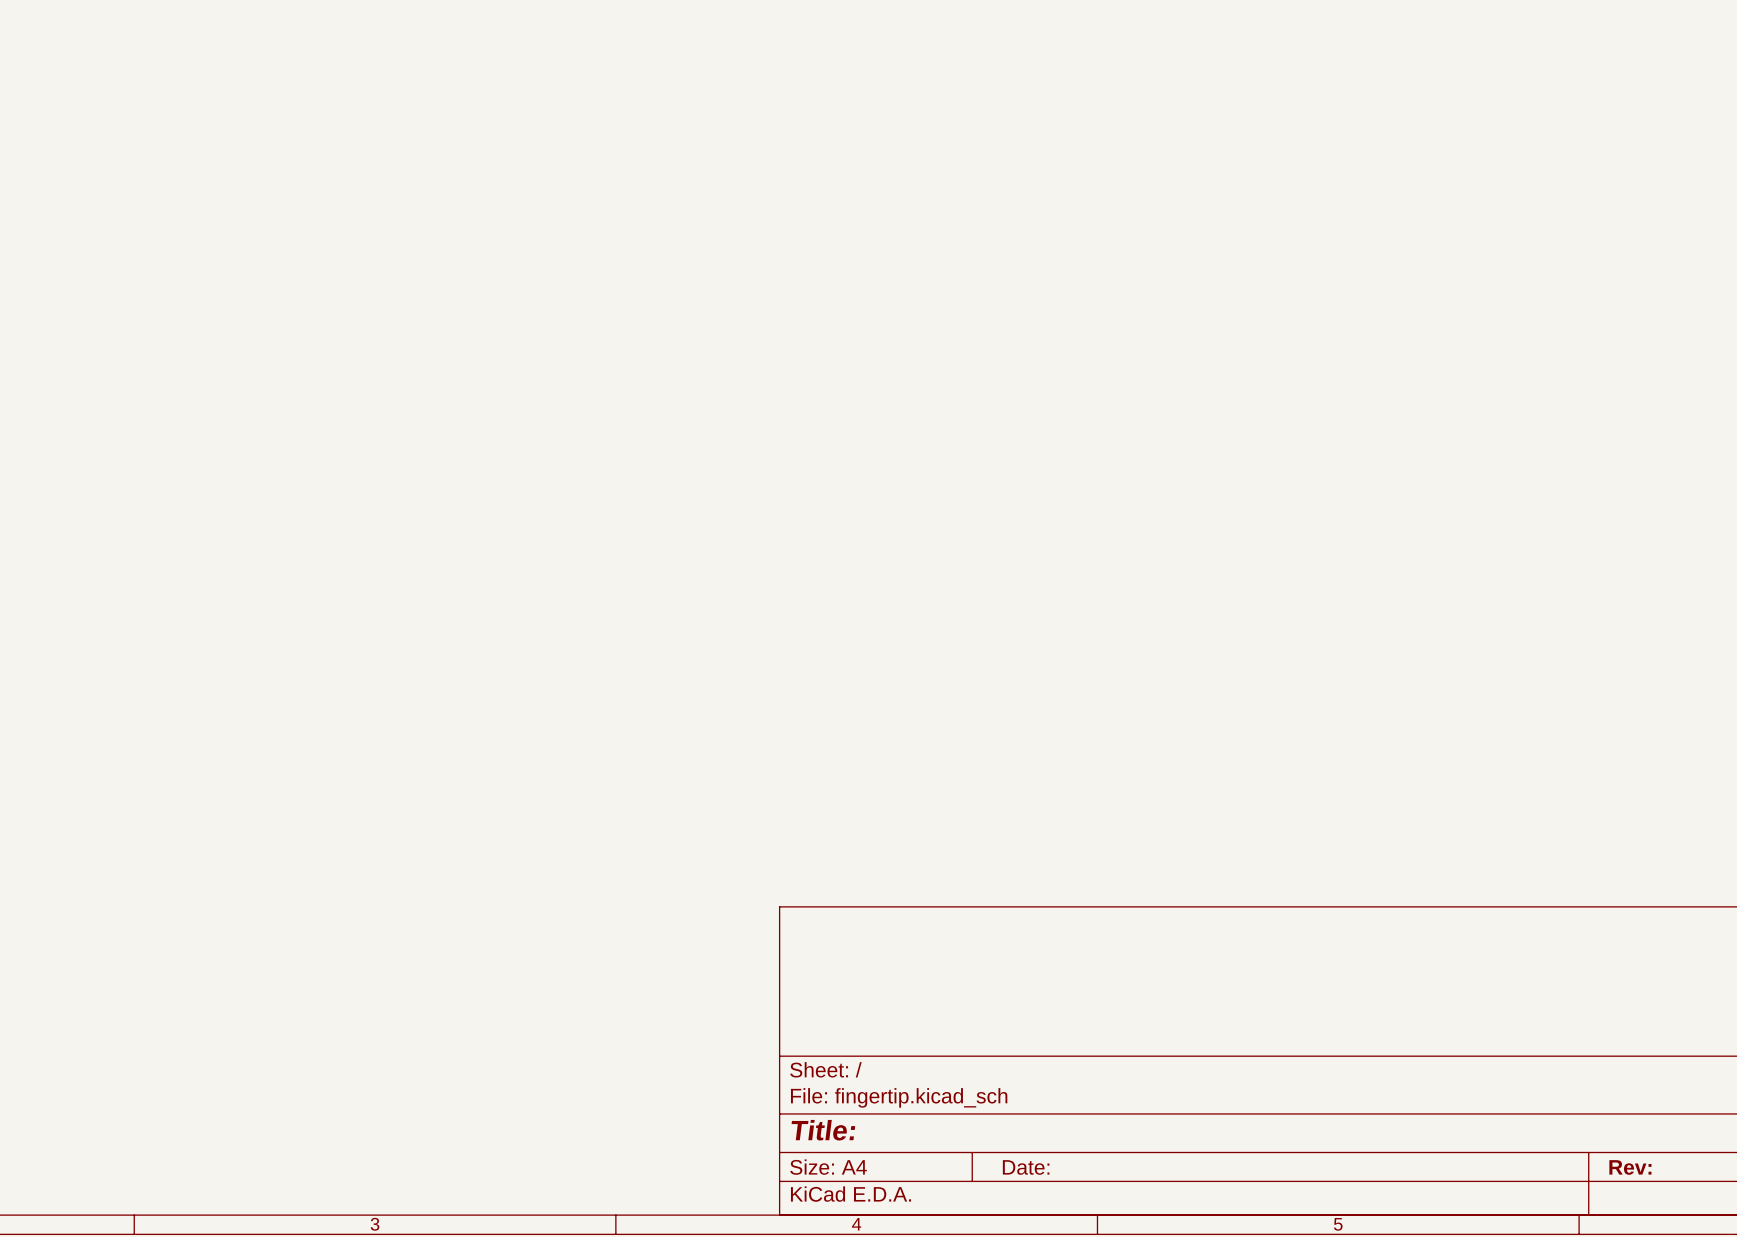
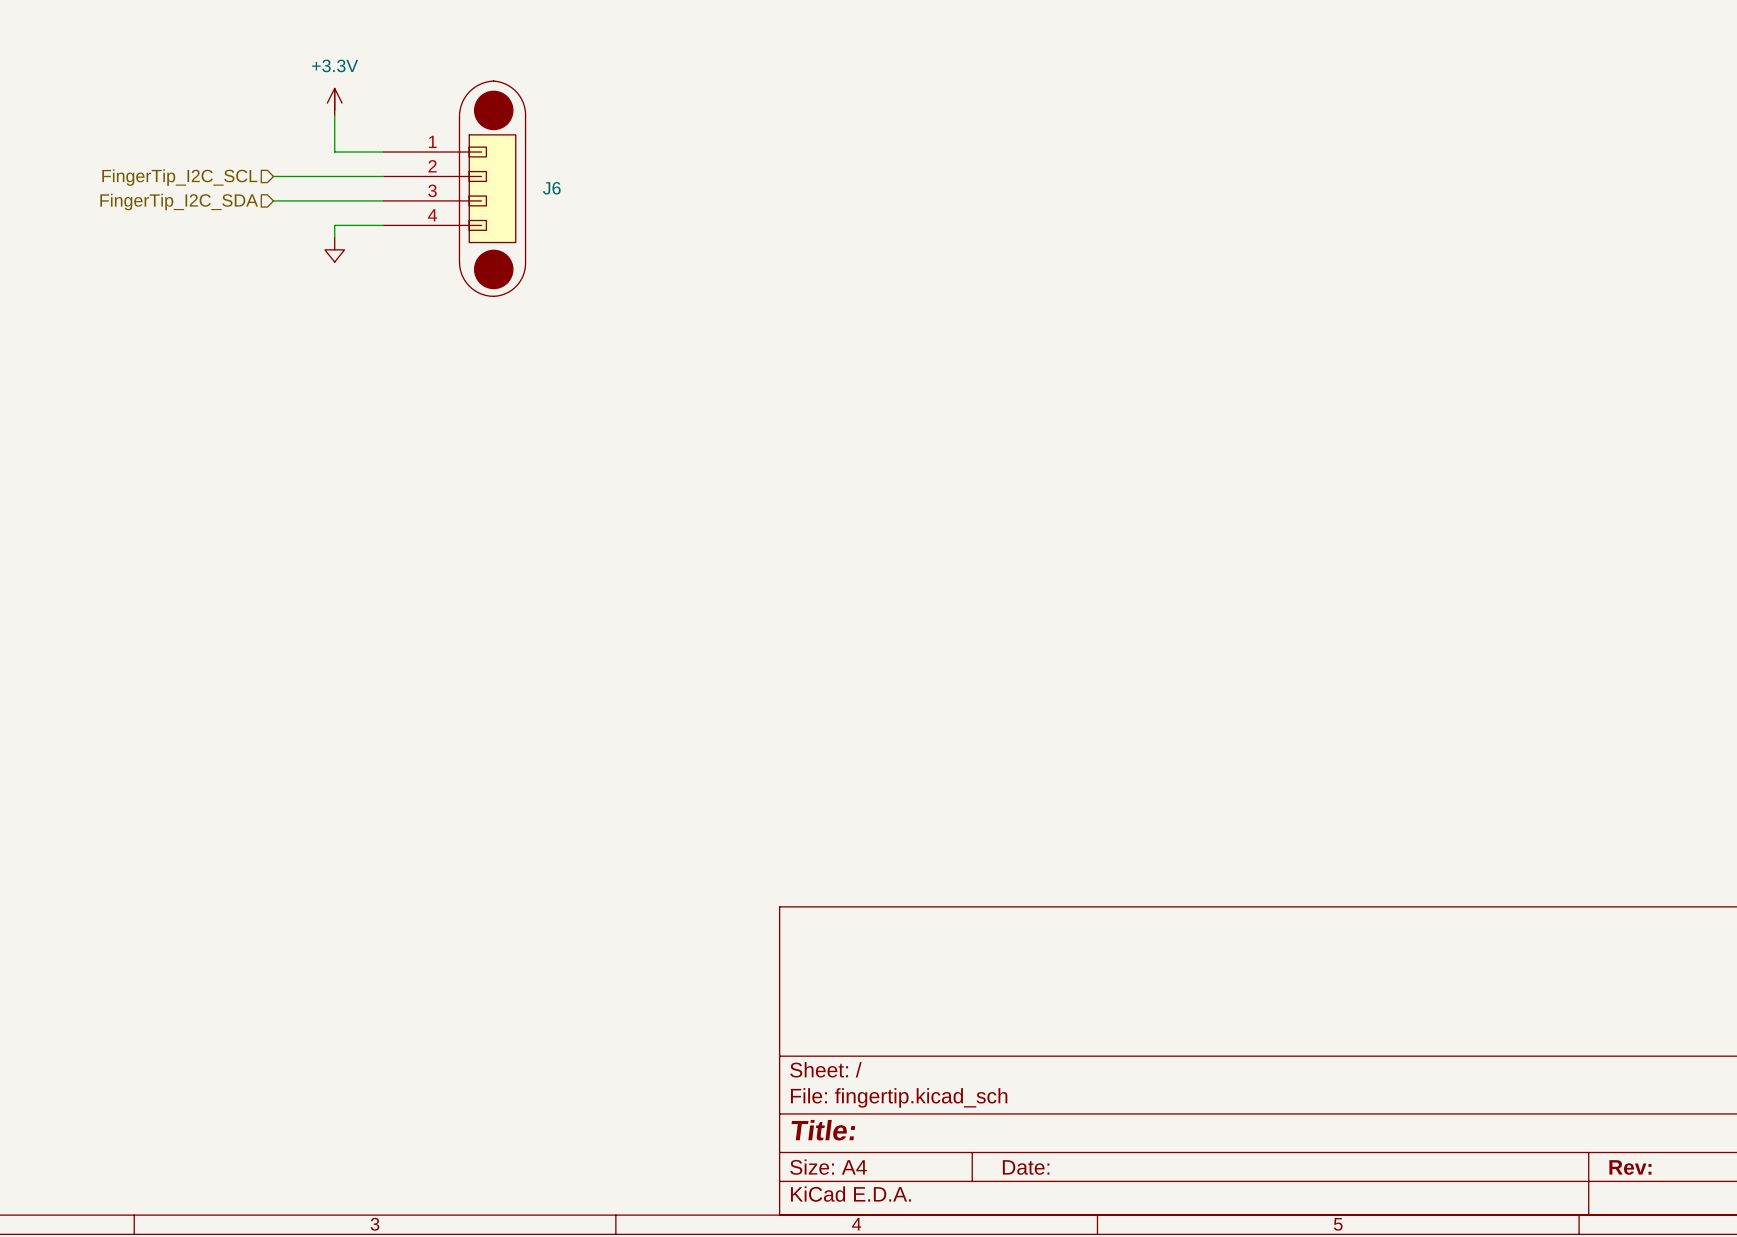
power symbol: none -> +3.3V (334, 101)
wire: none -> (334, 115) (334, 152) (383, 152)
wire: none -> (273, 176) (383, 176)
hierarchical label: none -> FingerTip_I2C_SCL (179, 177)
J6: none -> (454, 188)
wire: none -> (273, 200) (383, 200)
hierarchical label: none -> FingerTip_I2C_SDA (179, 202)
wire: none -> (383, 225) (334, 225) (334, 237)
power symbol: none -> (334, 249)

